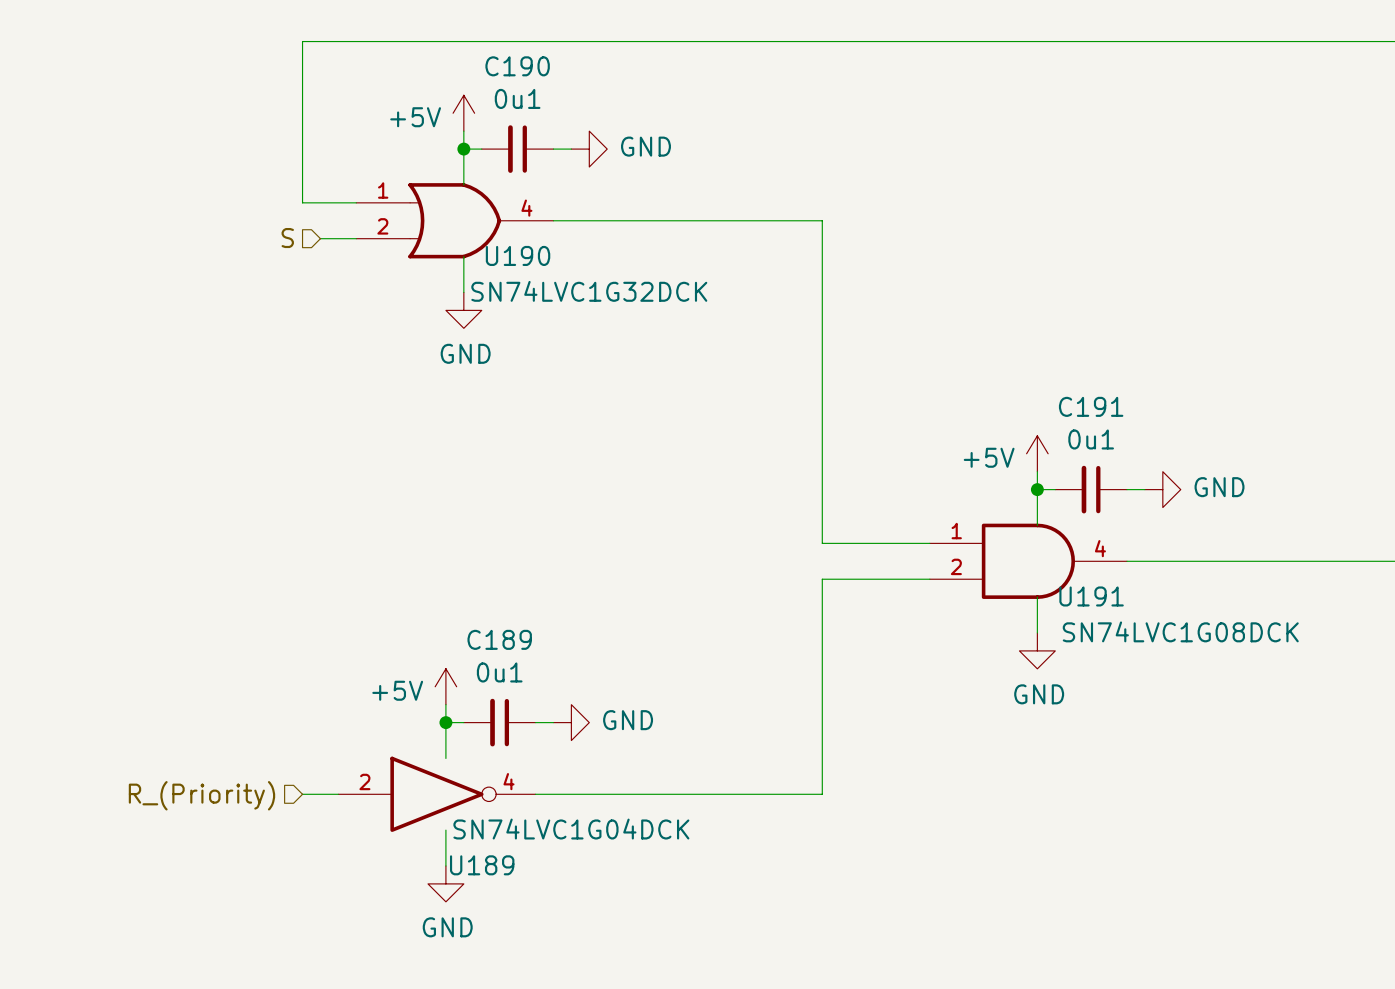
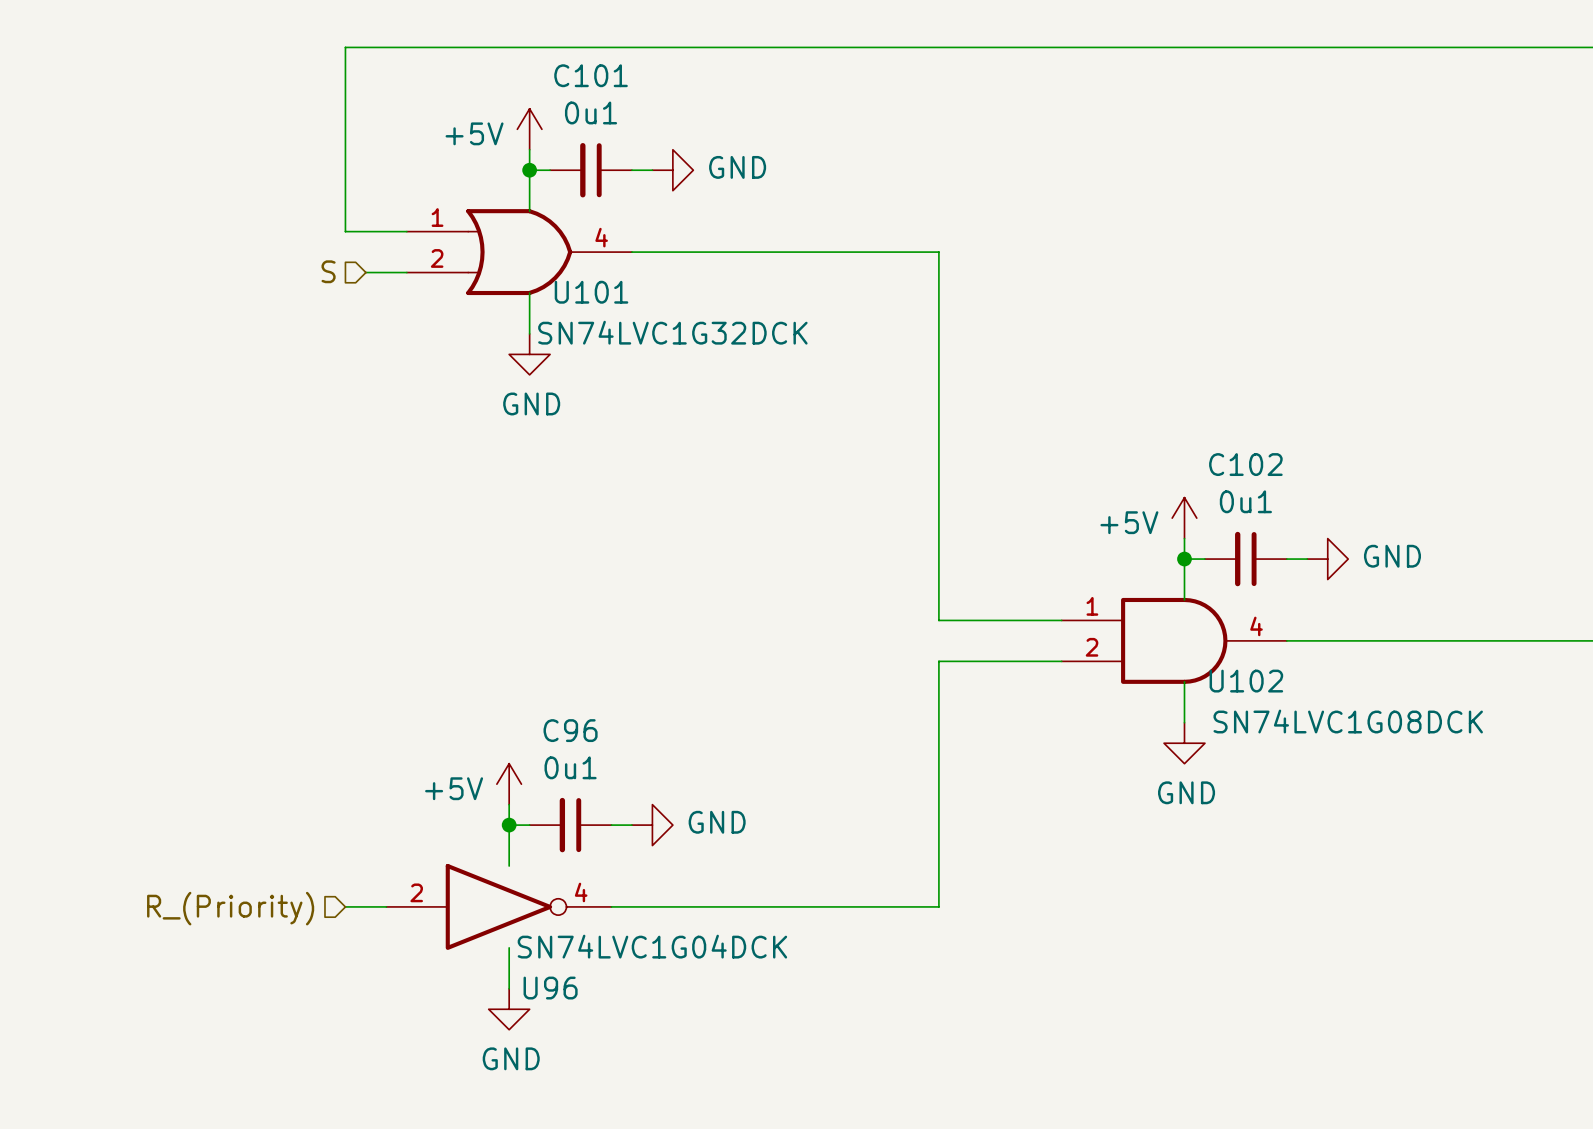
C190 name: C190 (517, 66) -> C101 (591, 75)
U190 name: U190 (518, 255) -> U101 (591, 292)
C191 name: C191 (1091, 406) -> C102 (1245, 464)
U191 name: U191 (1091, 596) -> U102 (1246, 681)
C189 name: C189 (499, 639) -> C96 (570, 730)
U189 name: U189 (482, 865) -> U96 (550, 988)

